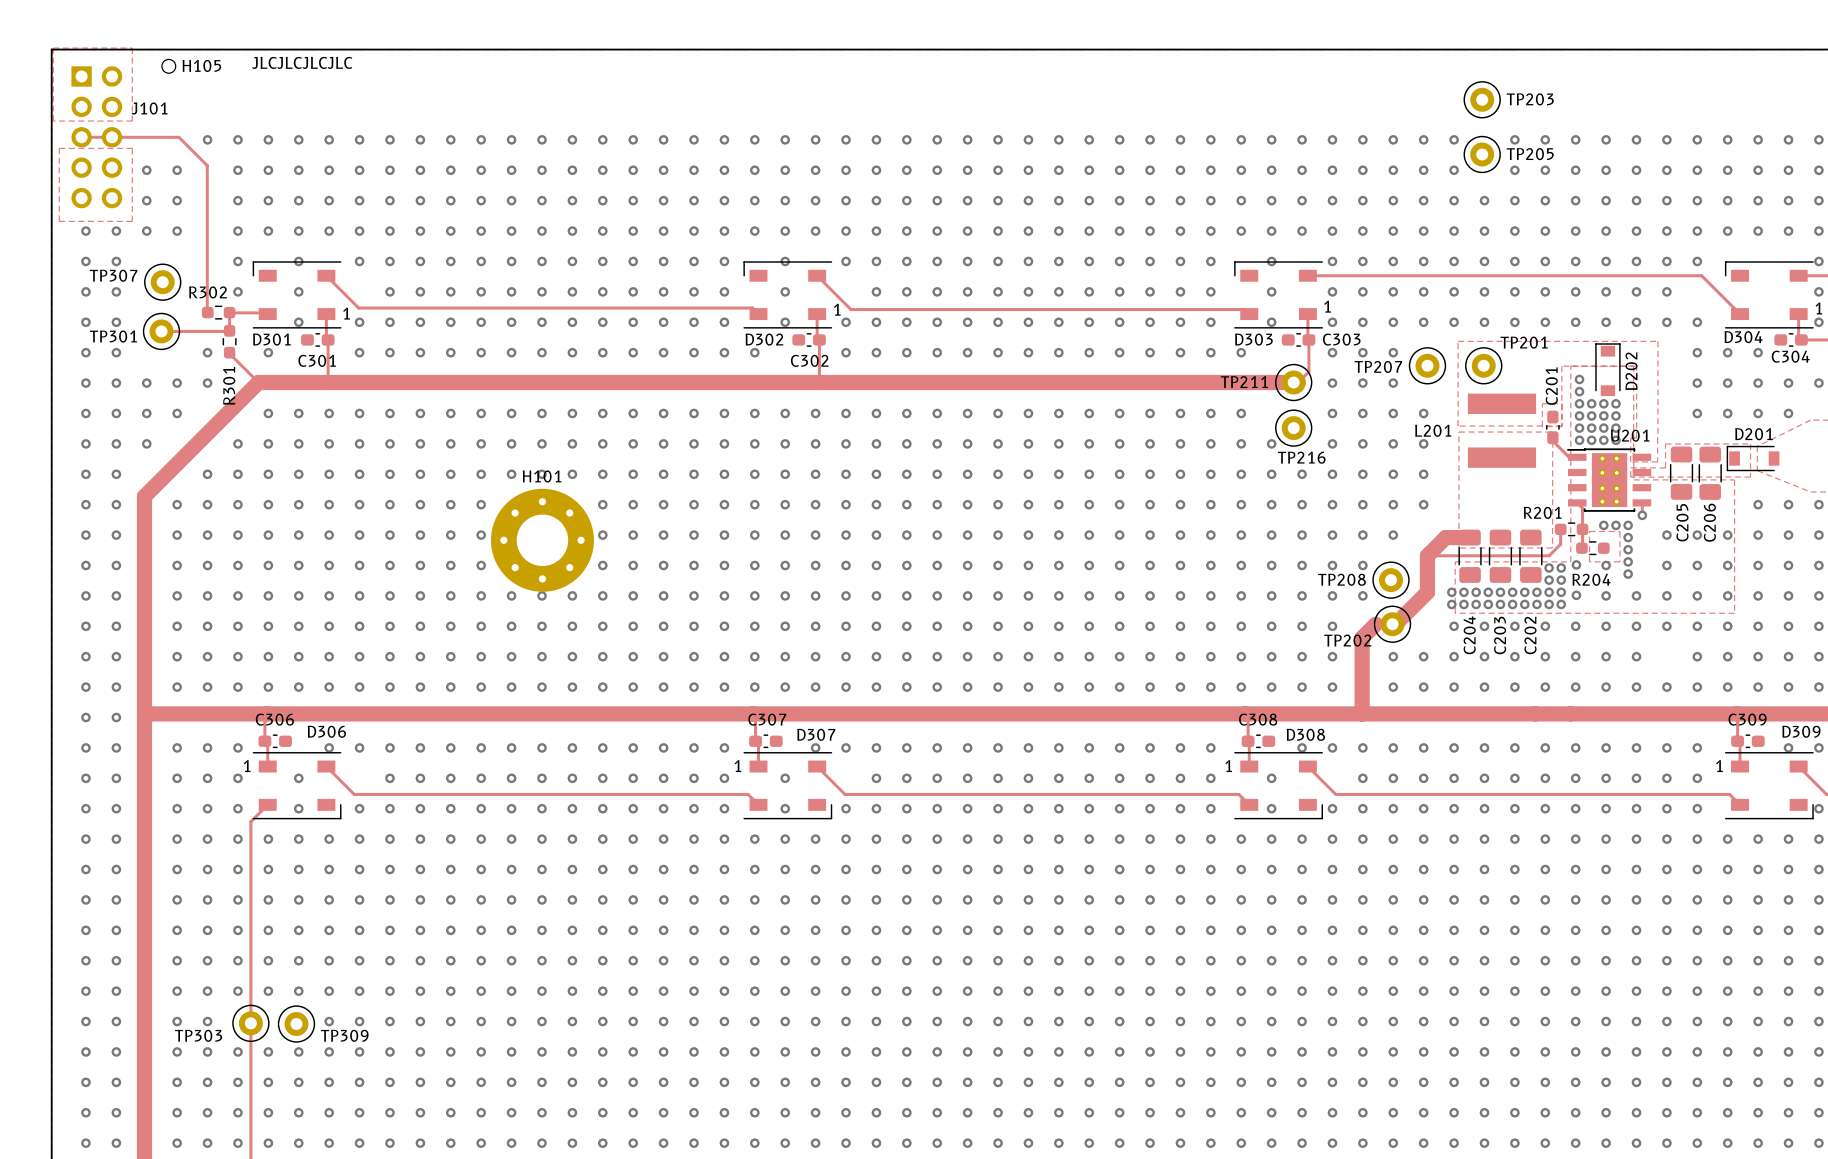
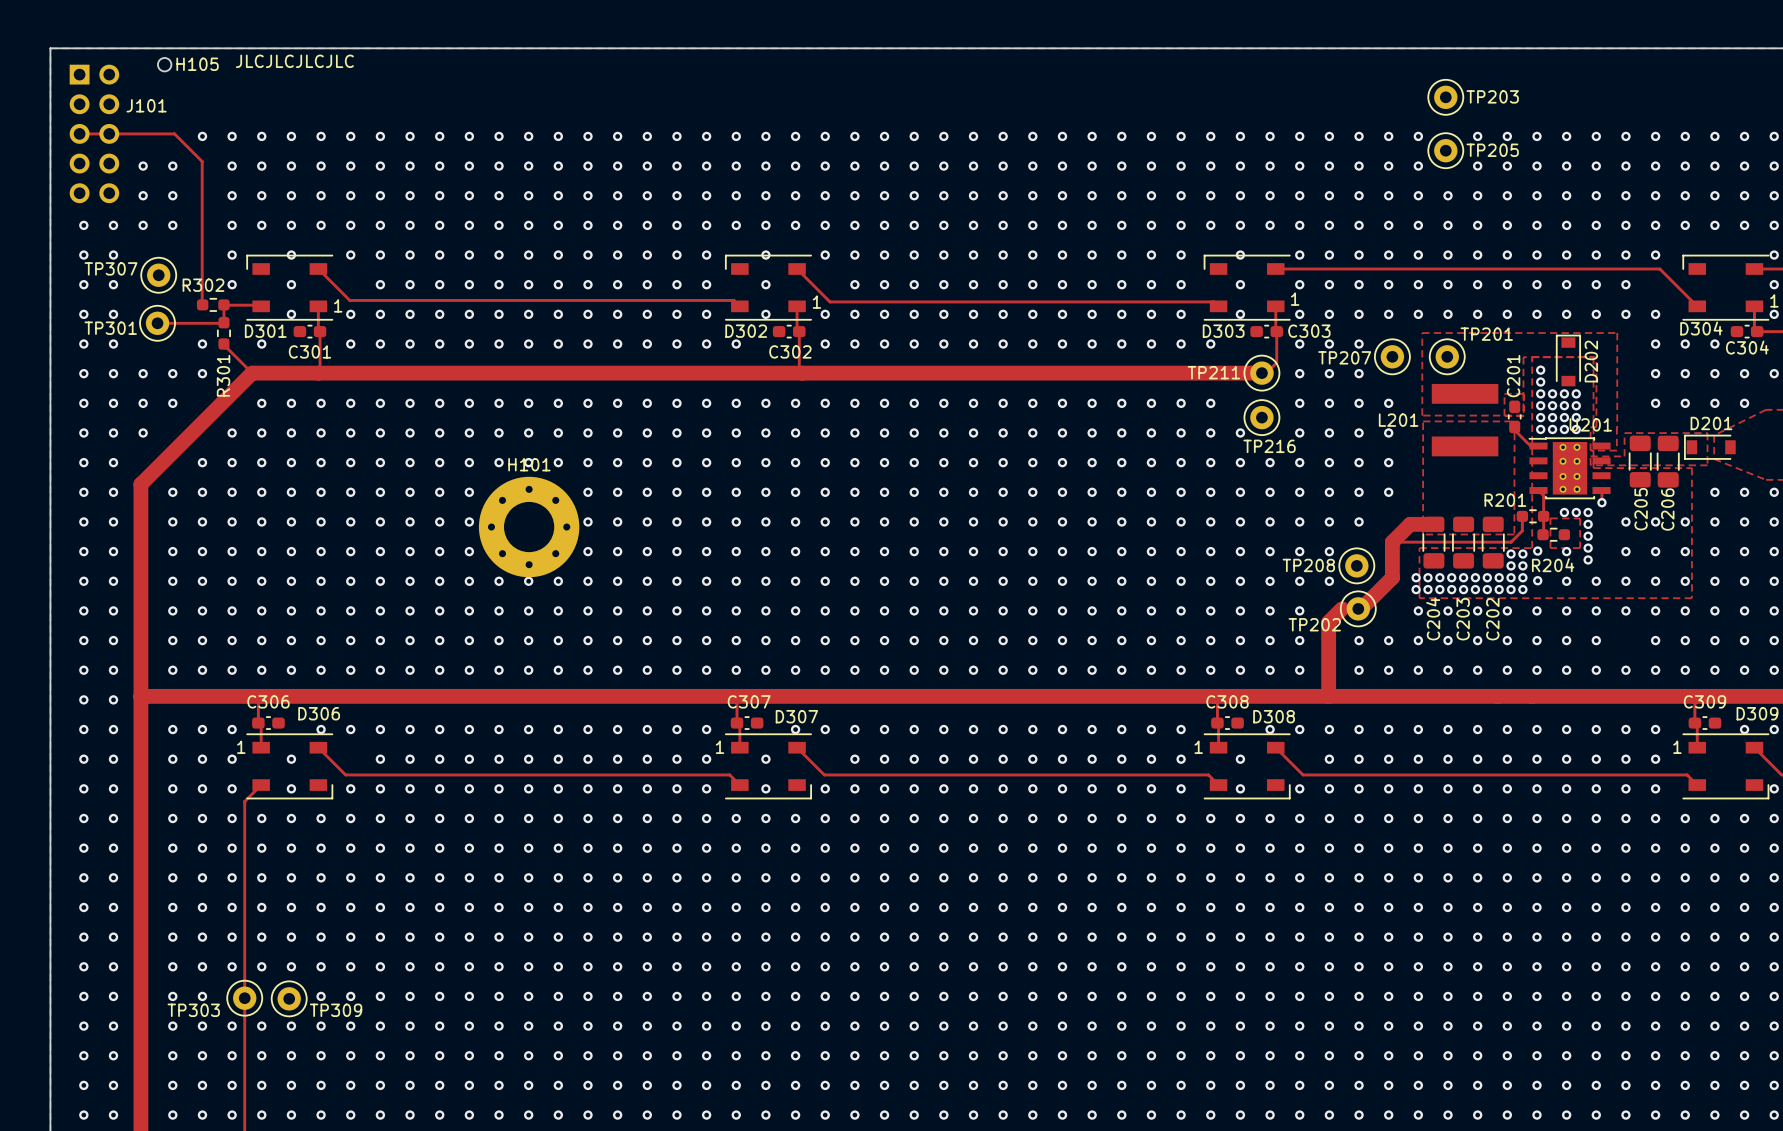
zone outline: (53, 48) (53, 121) (132, 121) (132, 48) (53, 48) -> none
zone outline: (59, 148) (59, 221) (132, 221) (132, 148) (59, 148) -> none

